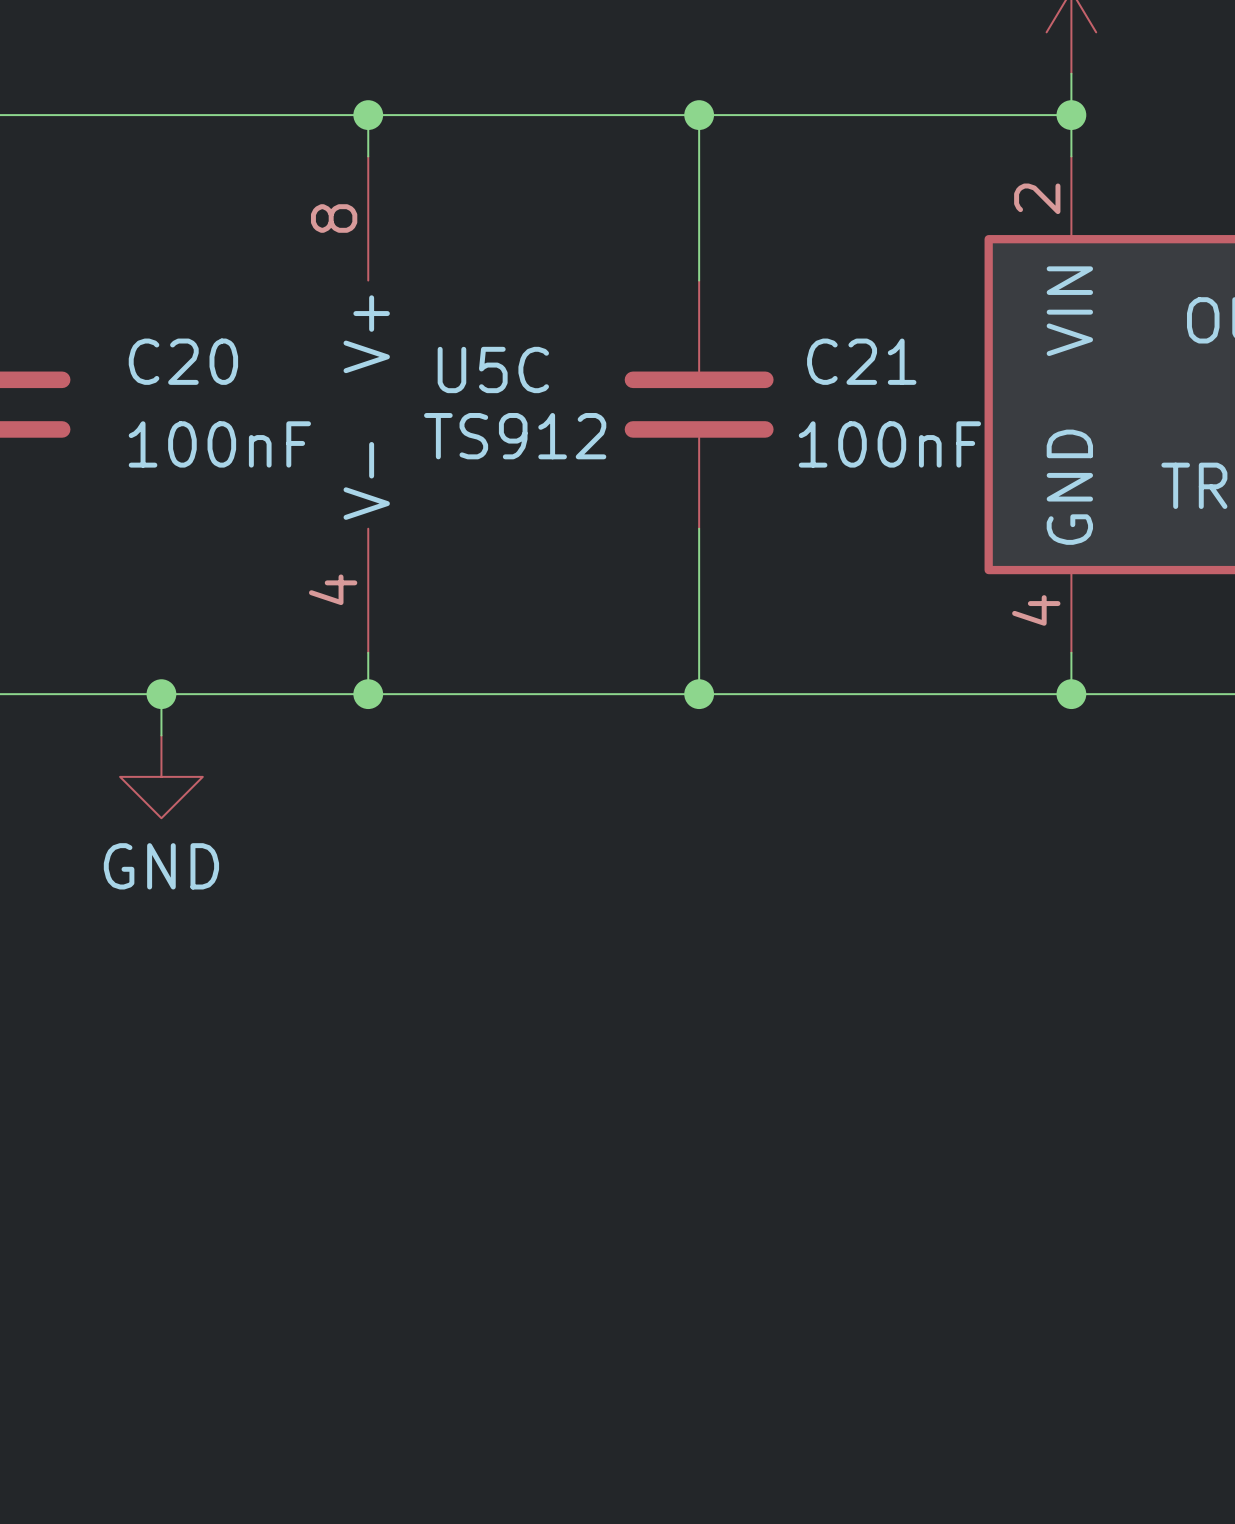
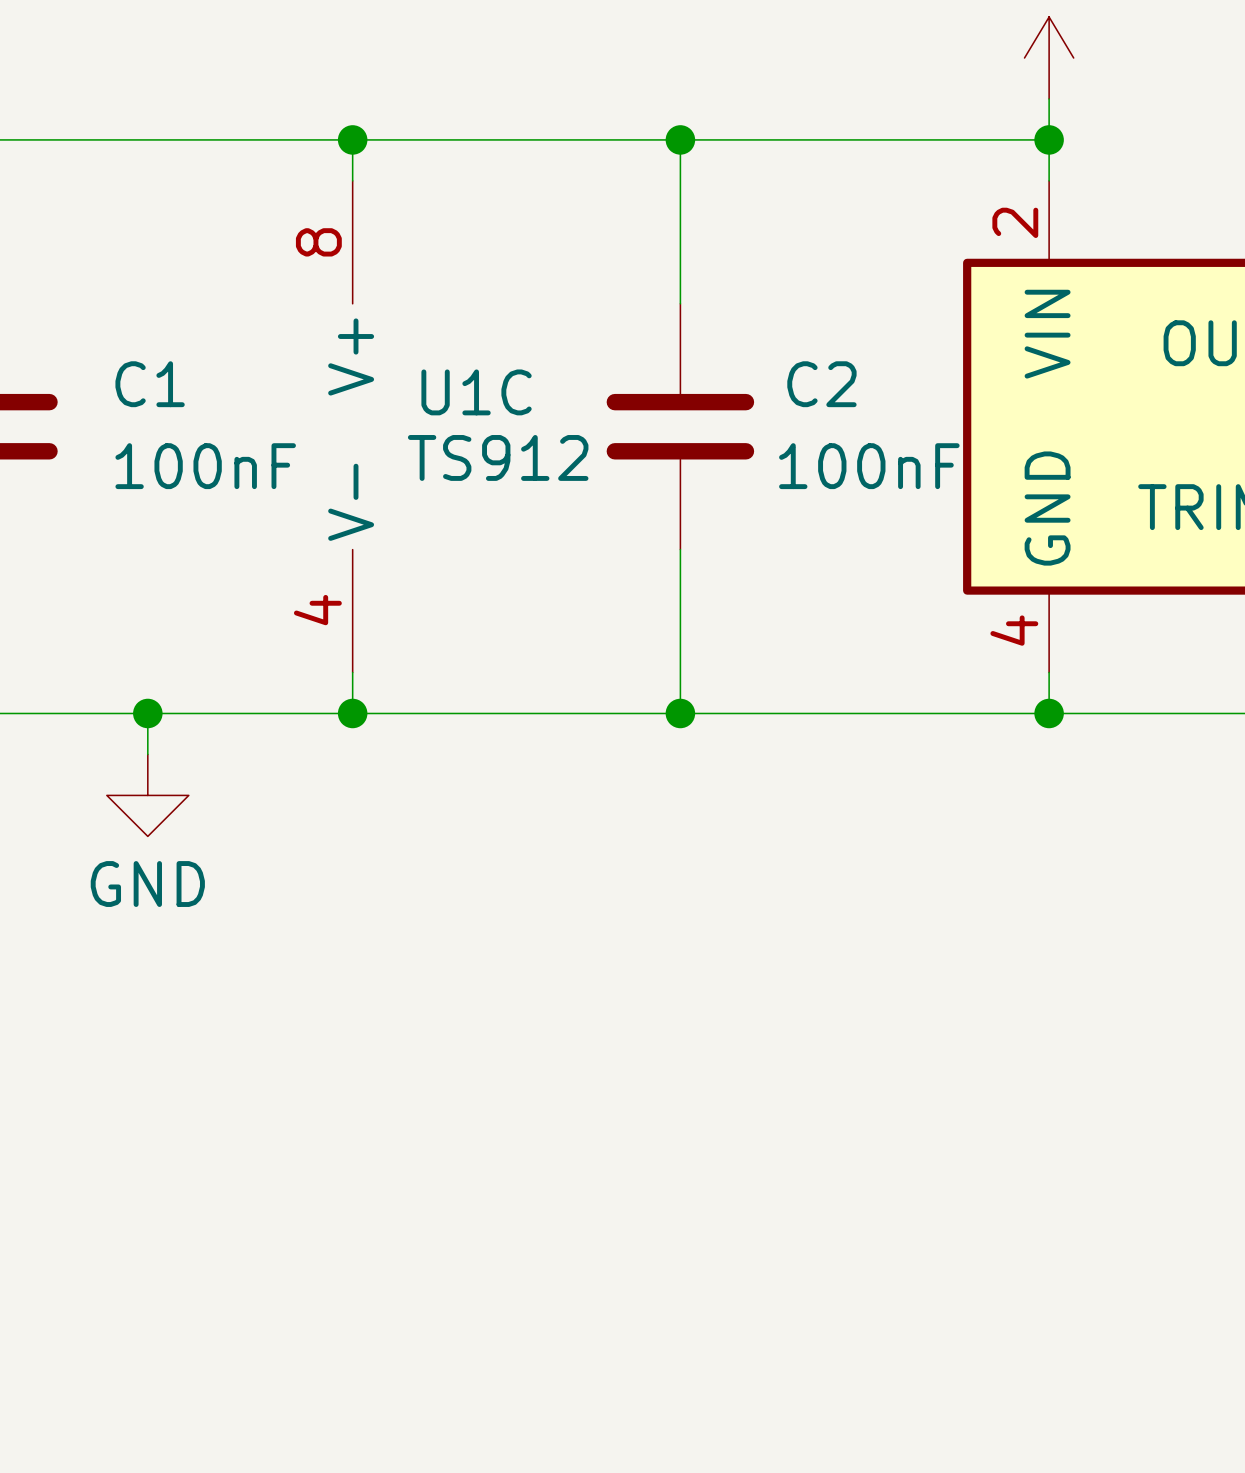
C20 name: C20 (183, 361) -> C1 (150, 384)
C21 name: C21 (861, 361) -> C2 (821, 384)
U5C name: U5C (493, 369) -> U1C (476, 392)

